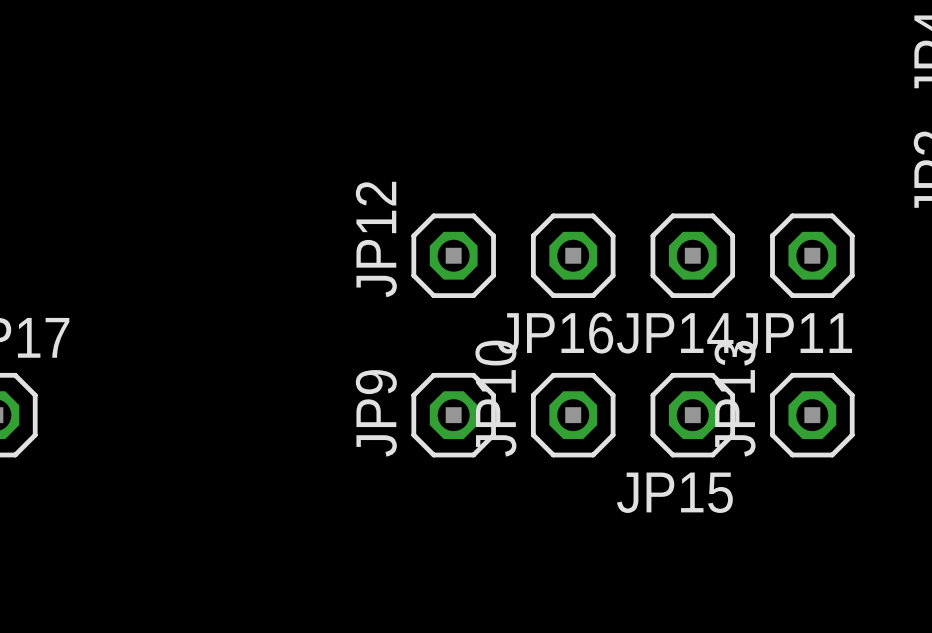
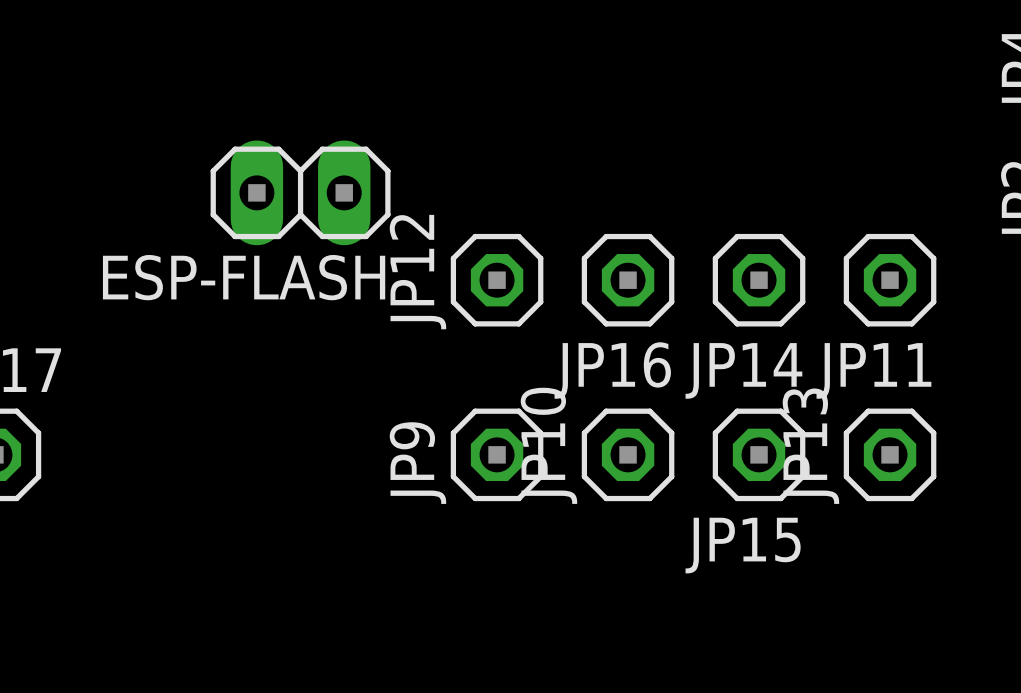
ESP-FLASH: none -> (300, 192)

